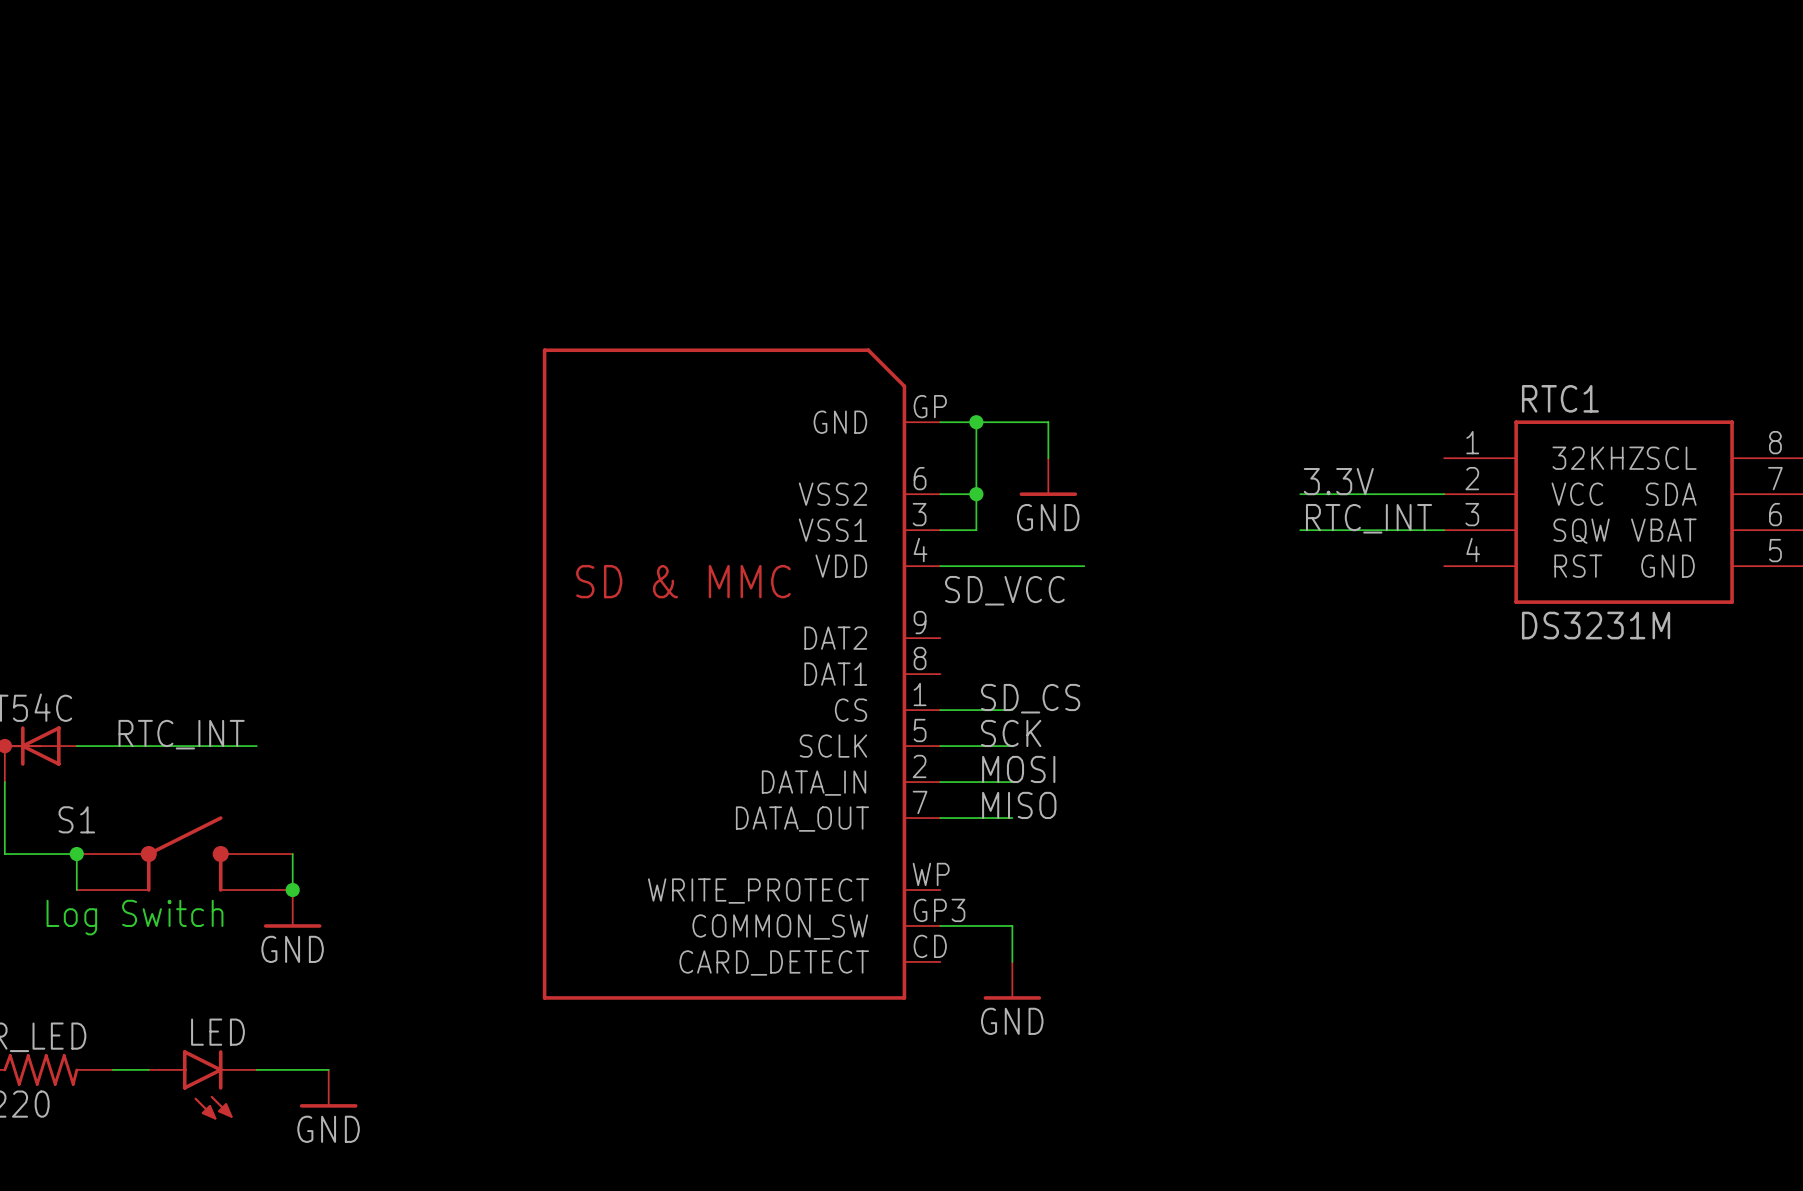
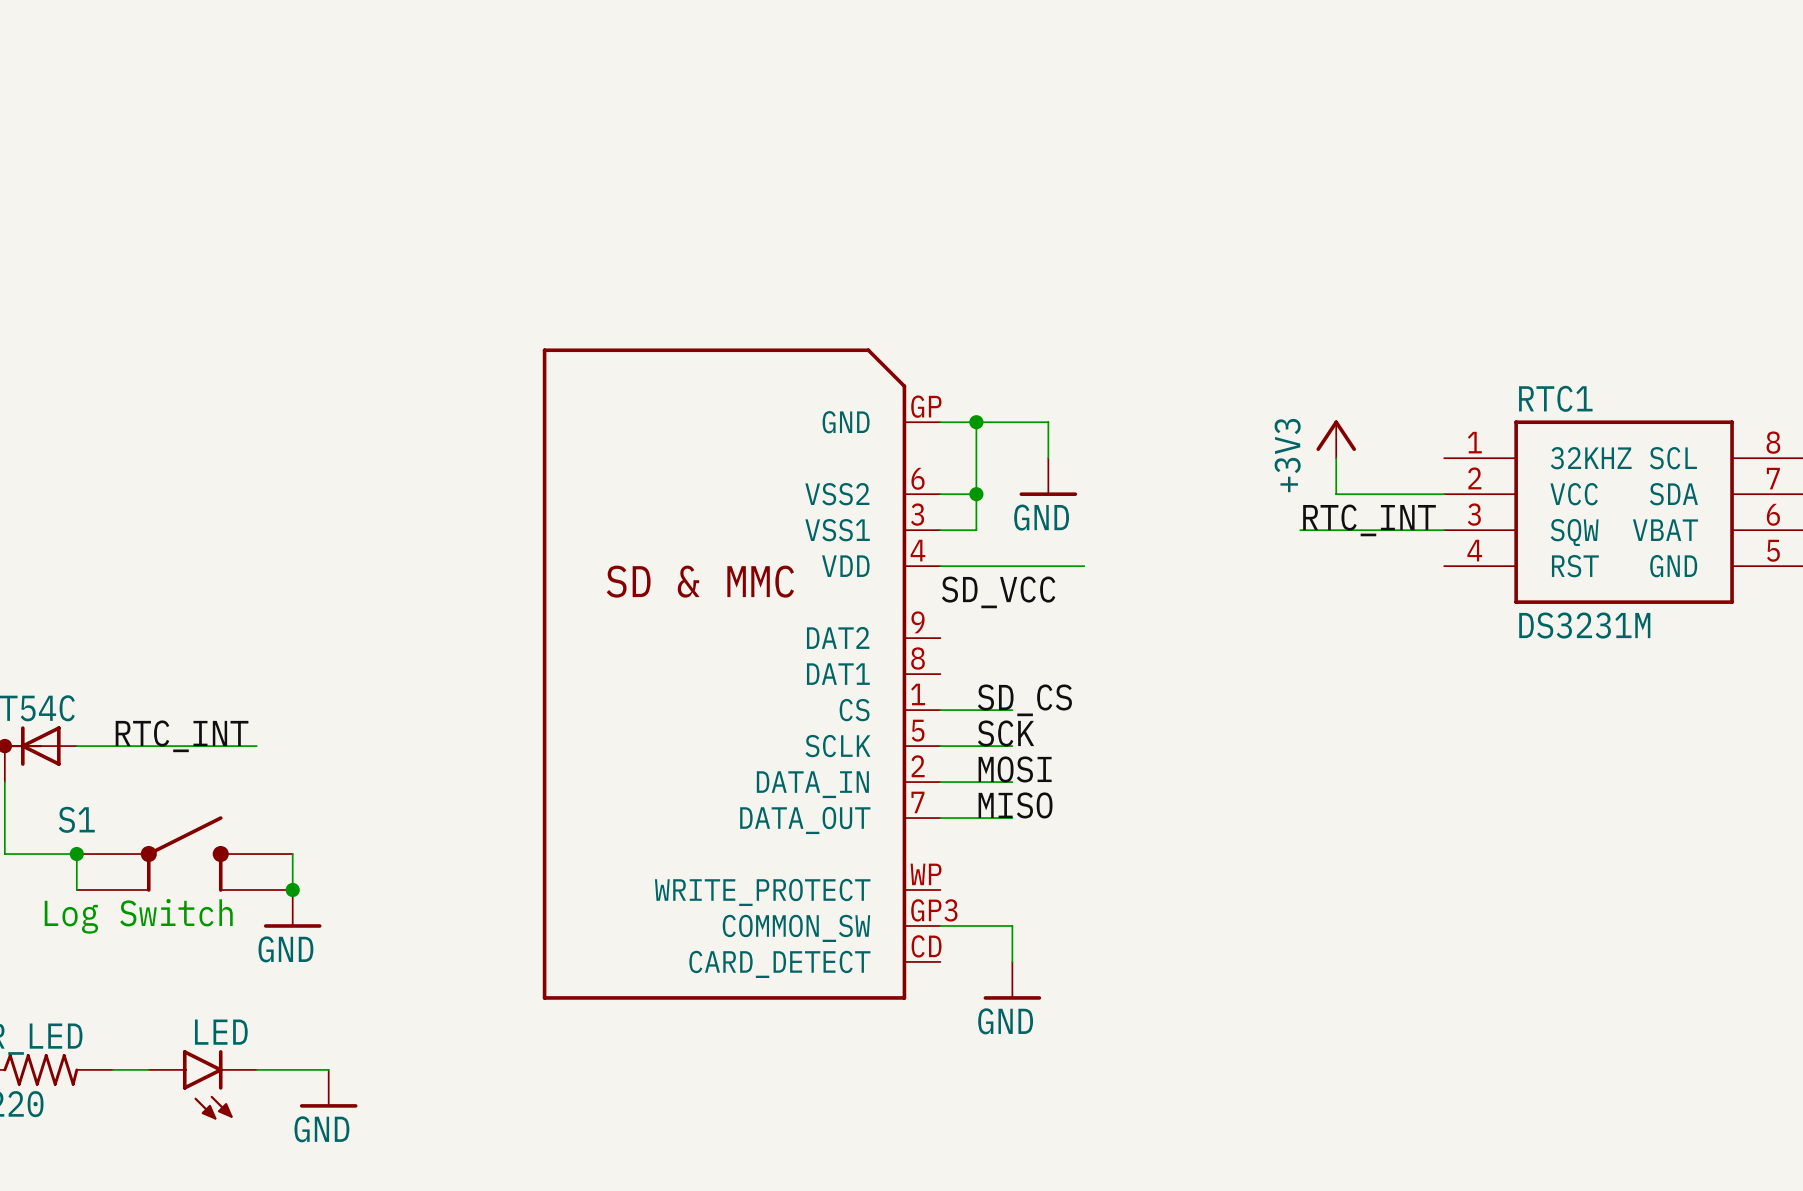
power symbol: none -> +3V3 (1336, 439)
label: 3.3V (1338, 481) -> none
wire: (1300, 494) (1336, 494) -> (1336, 458) (1336, 494)

